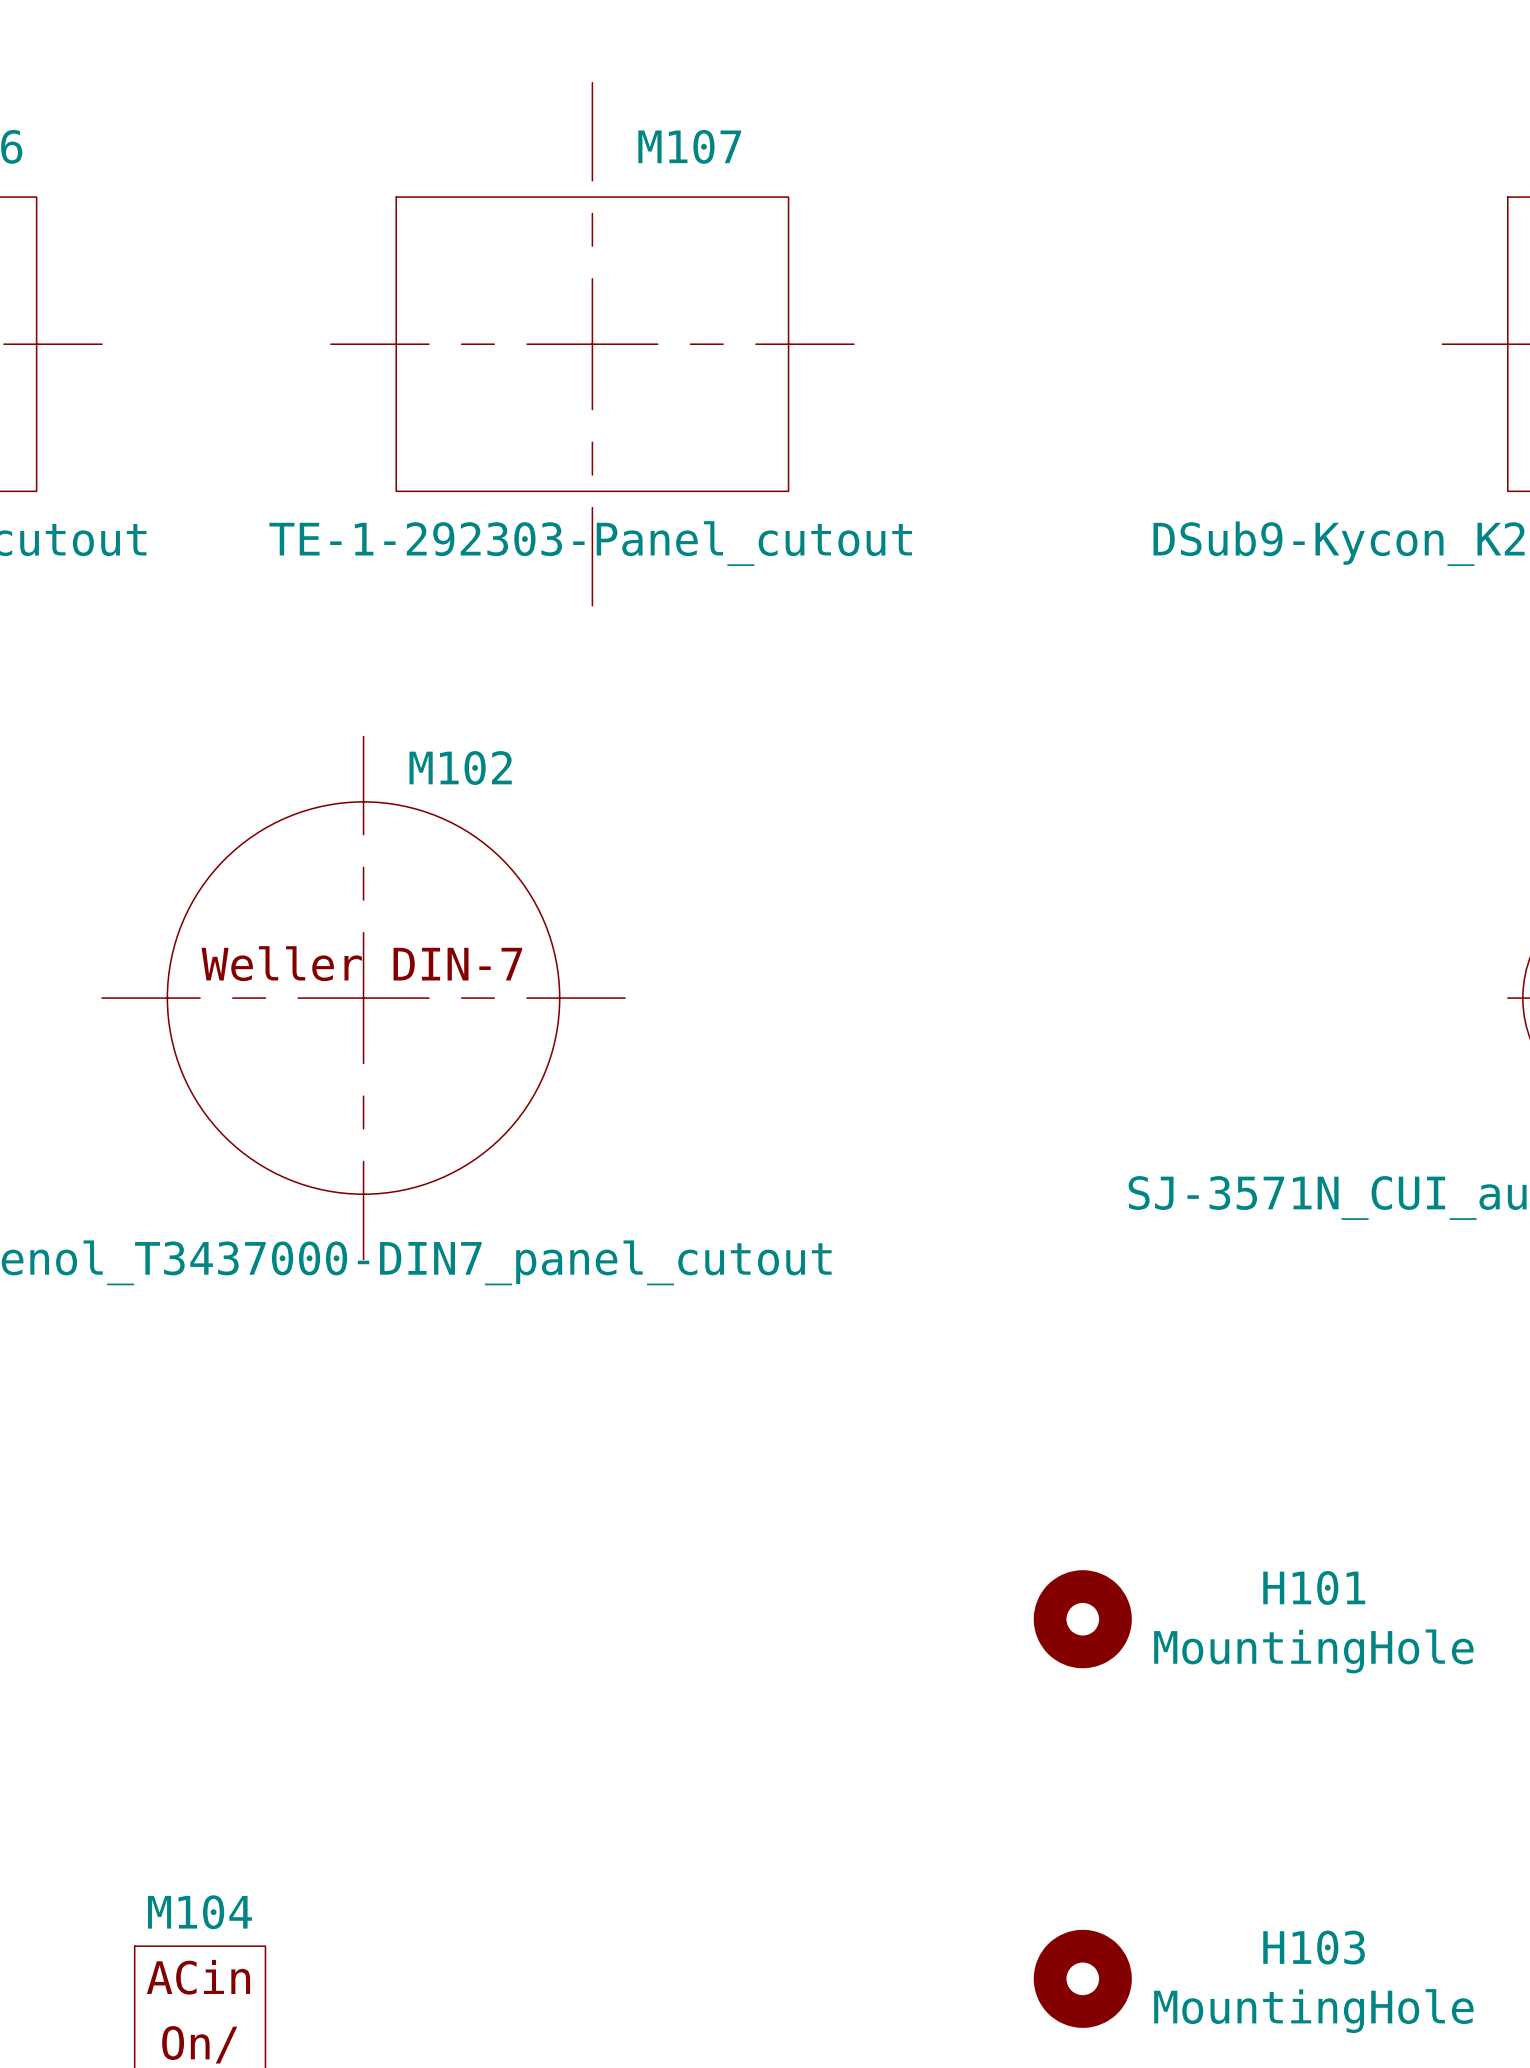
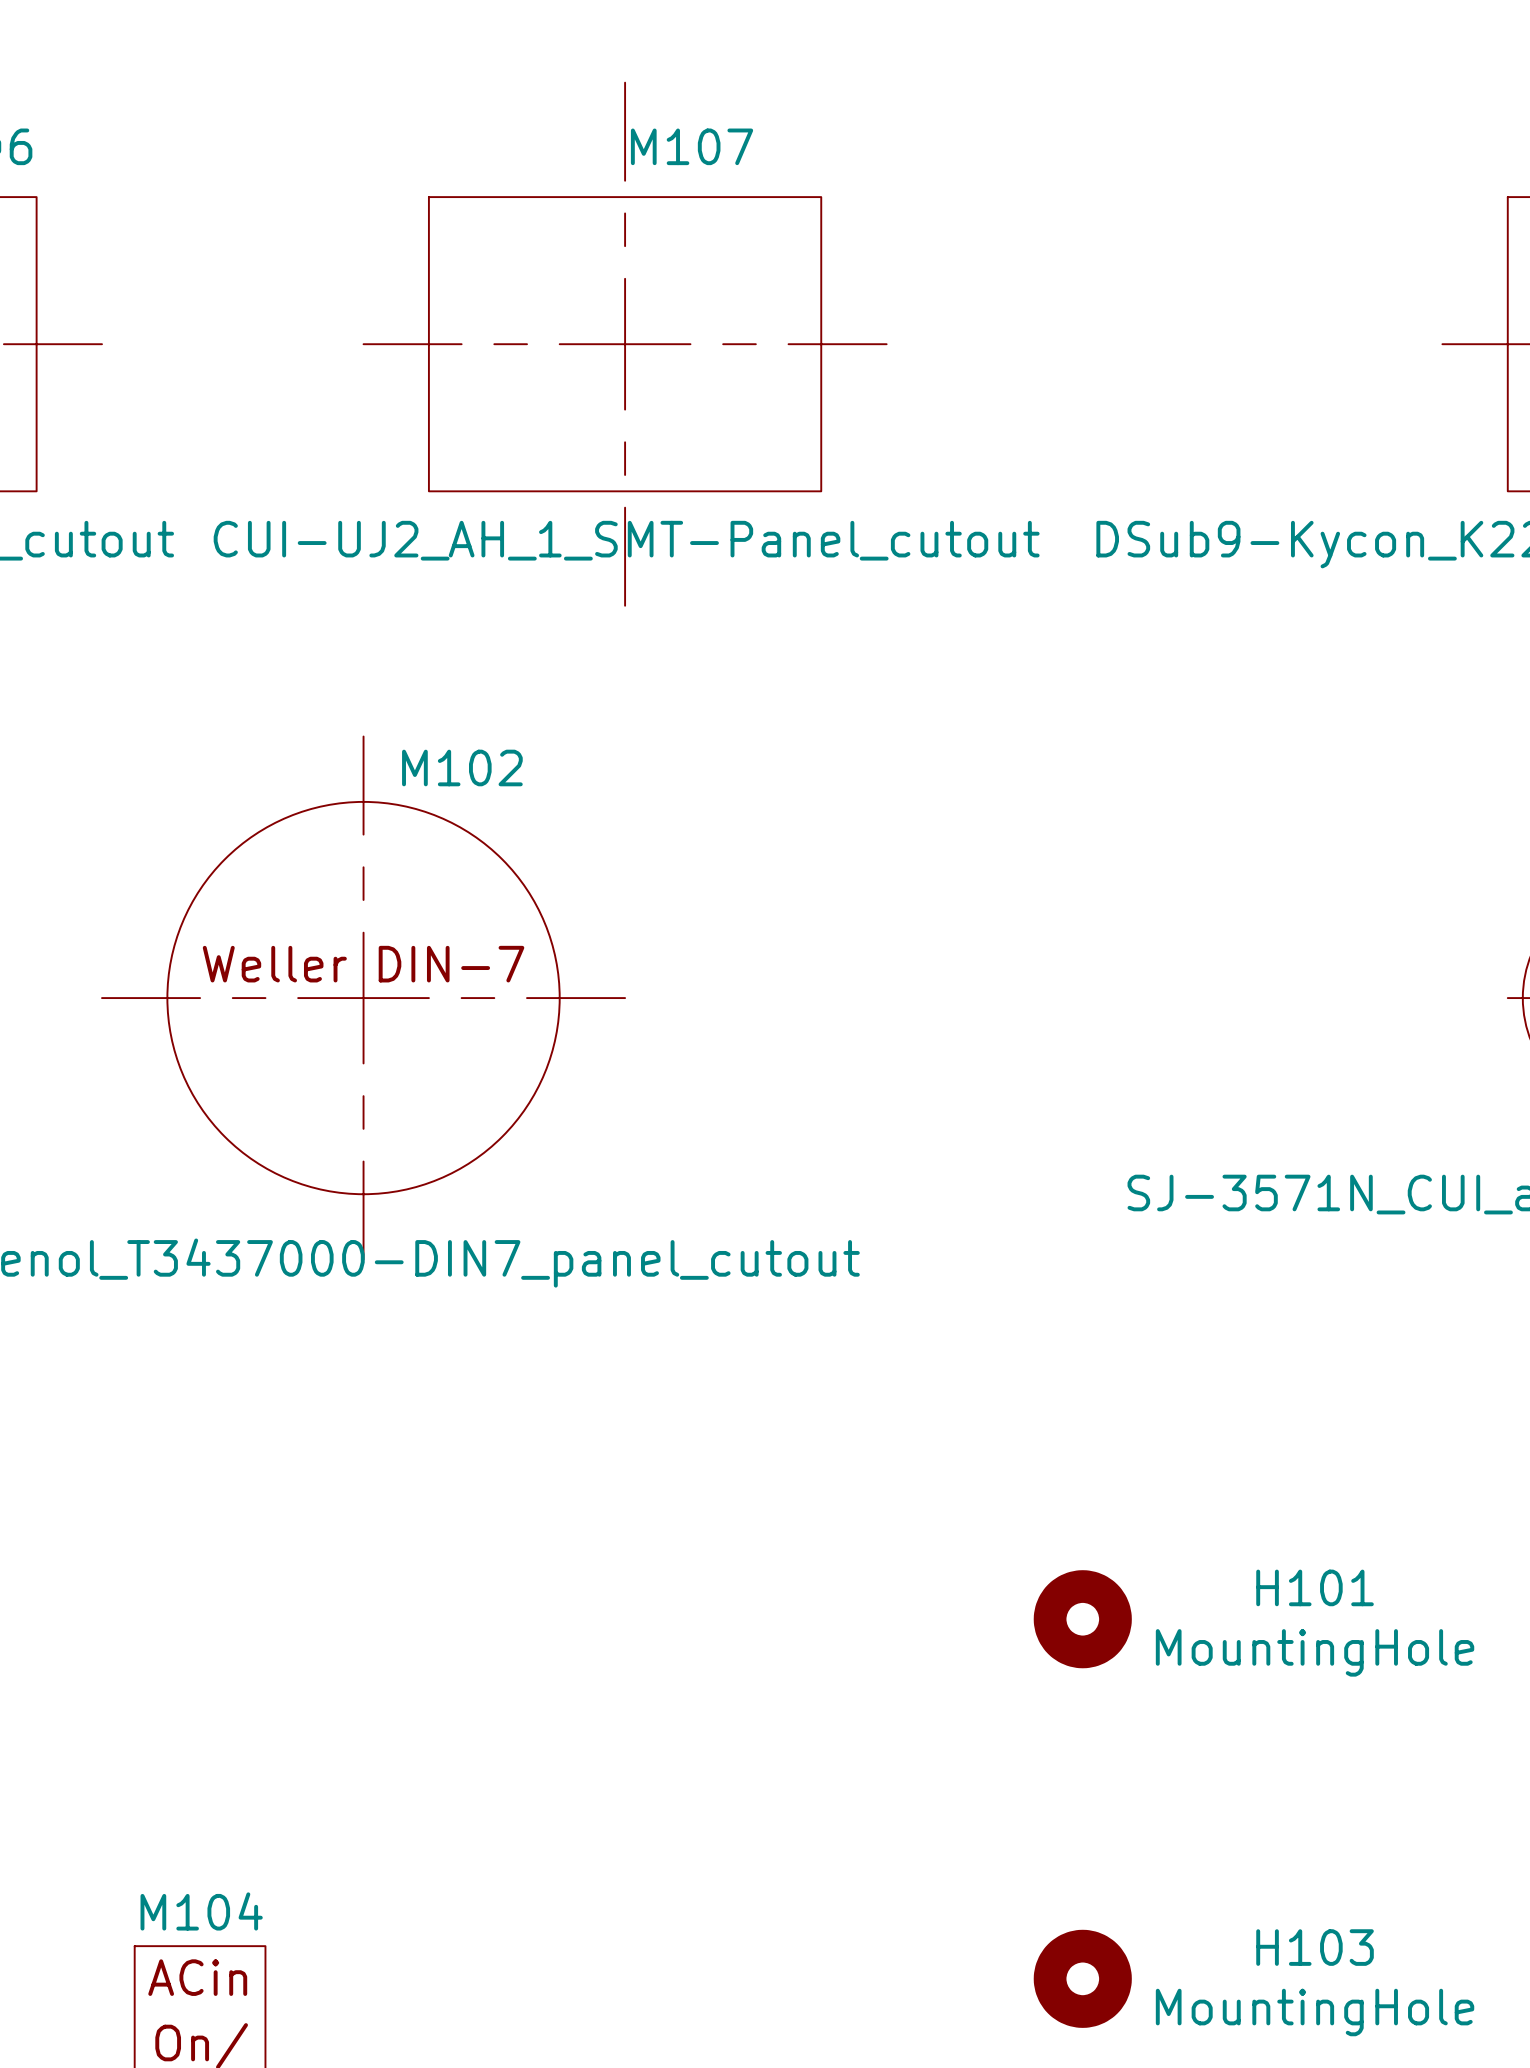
M107 position: (592, 344) -> (625, 344)
M107 value: TE-1-292303-Panel_cutout (590, 543) -> CUI-UJ2_AH_1_SMT-Panel_cutout (626, 540)

